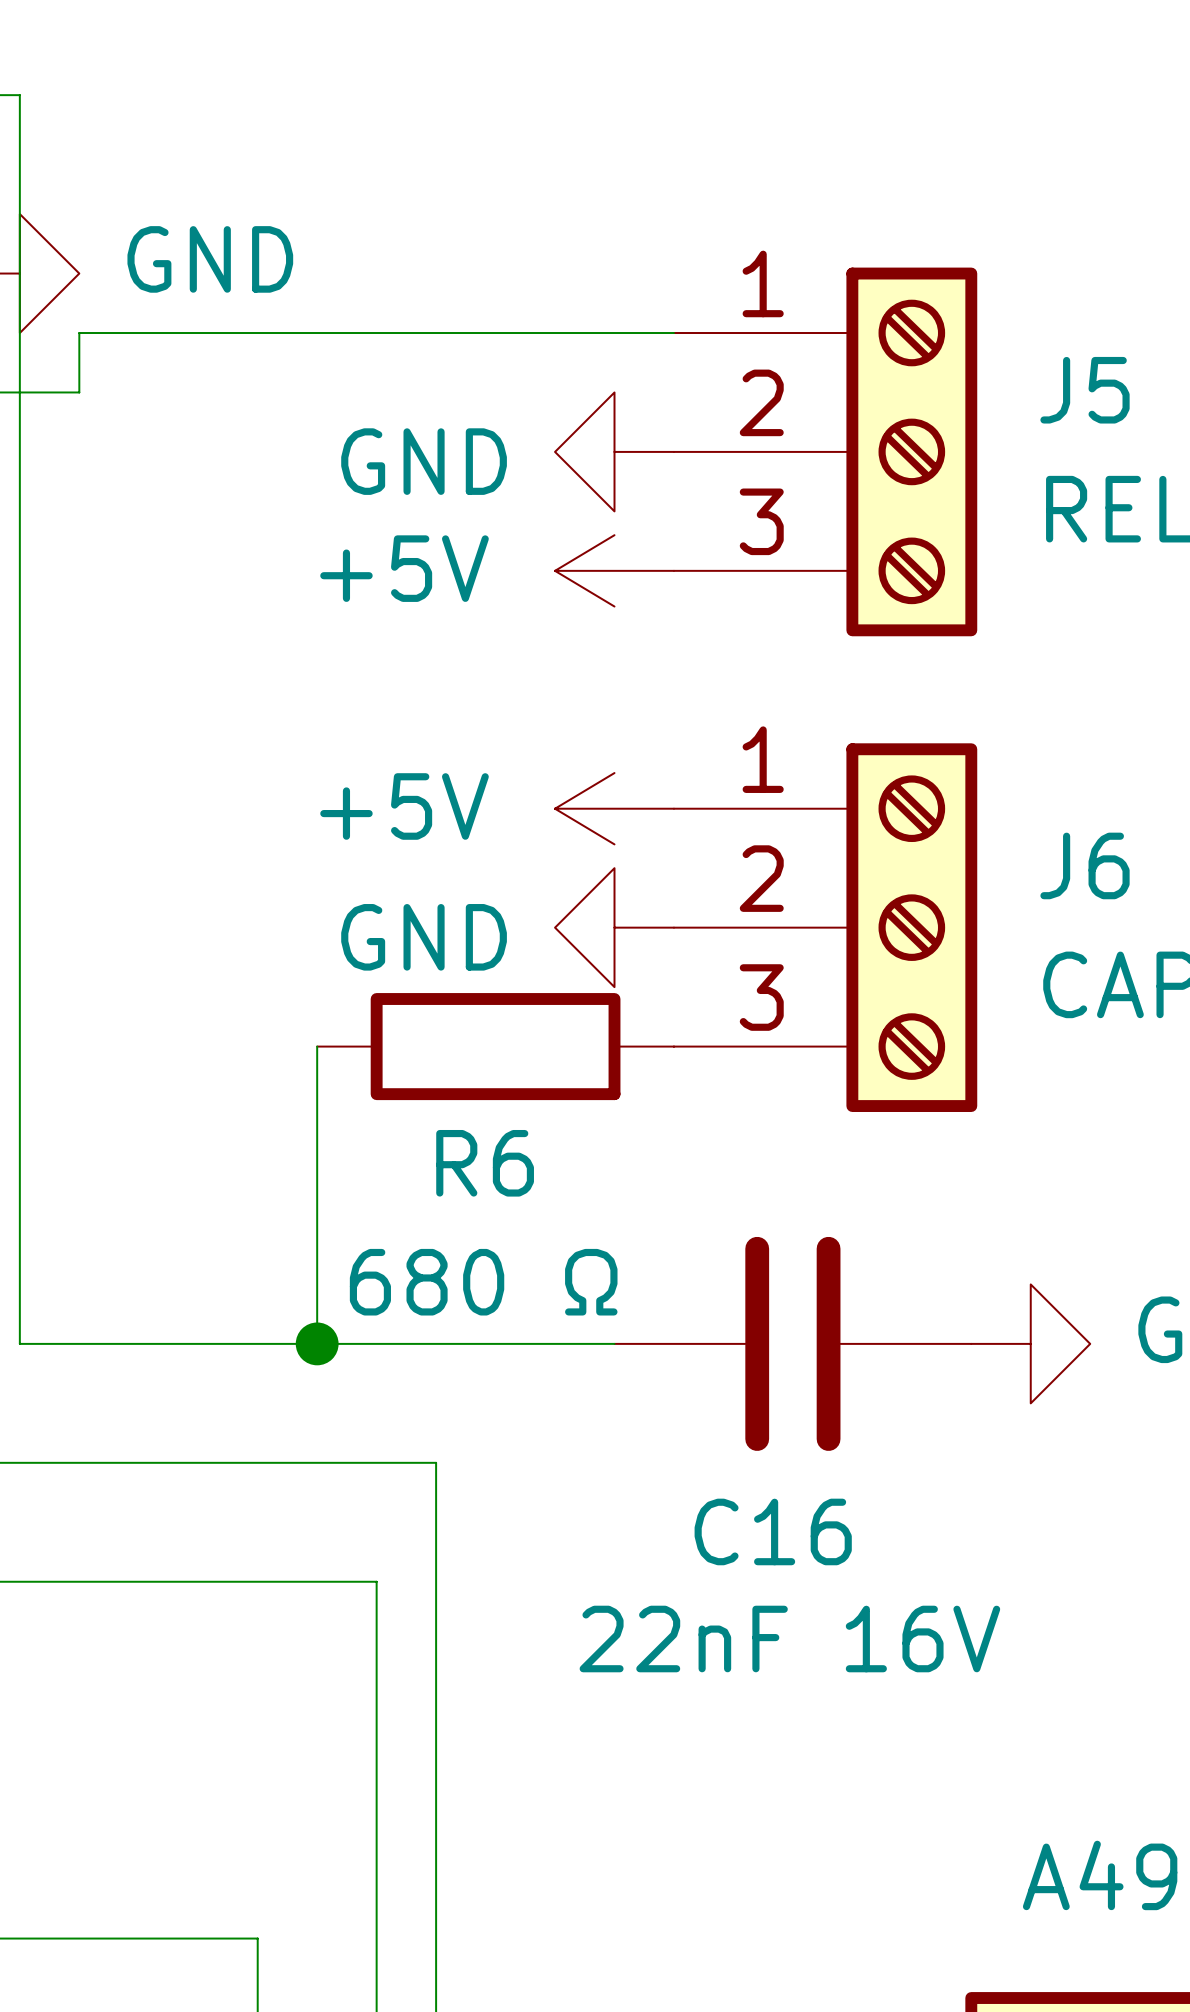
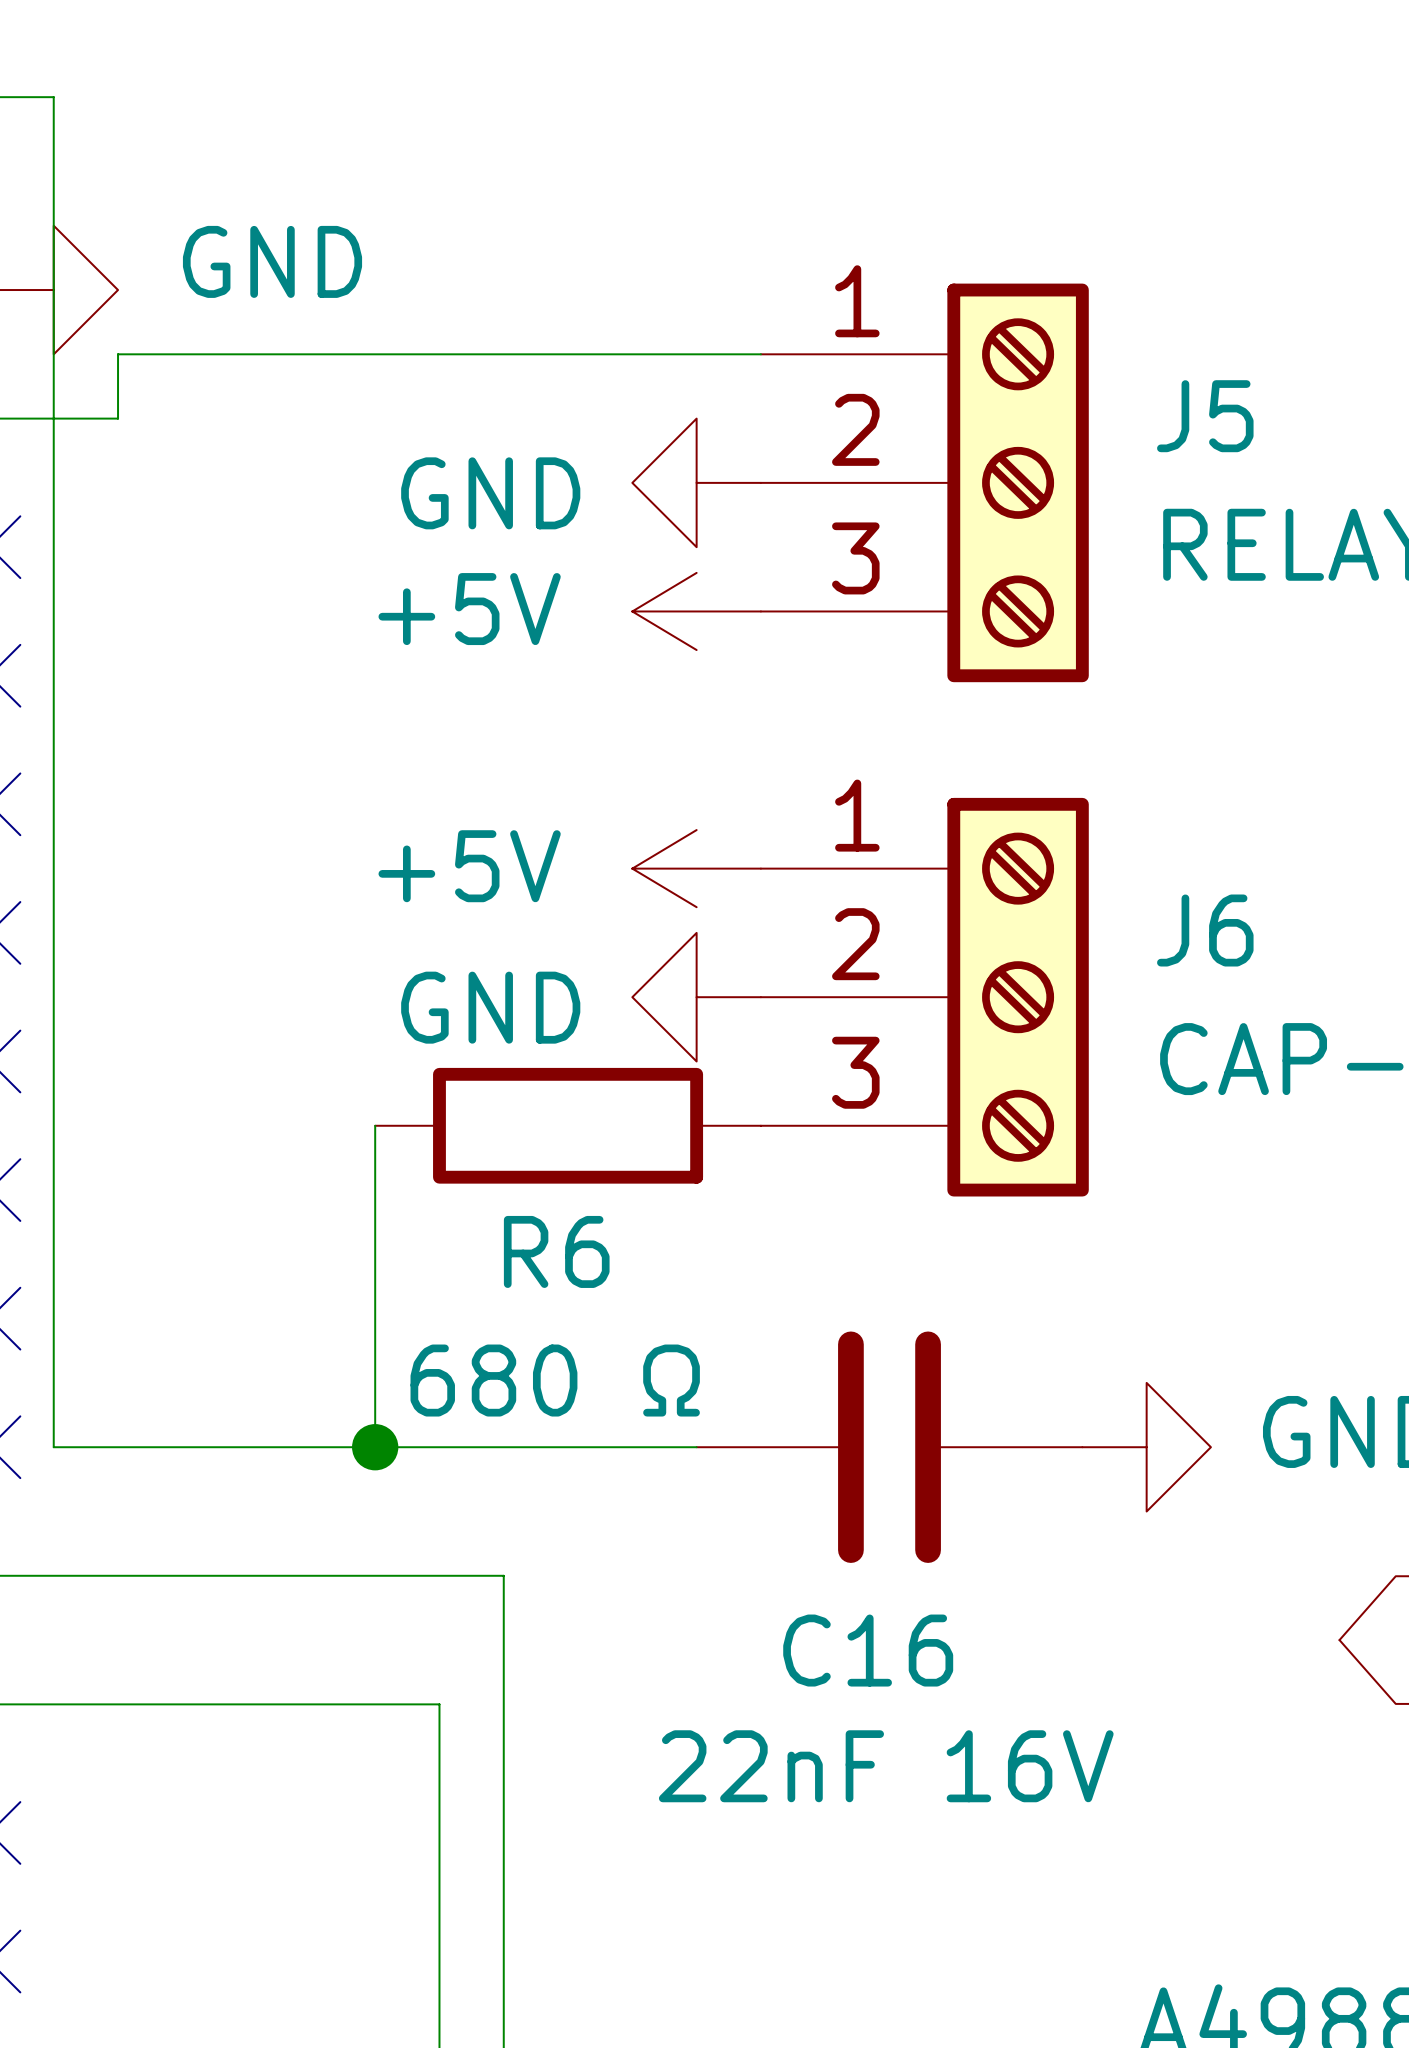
power symbol text position: GND (210, 259) -> GND (272, 261)

